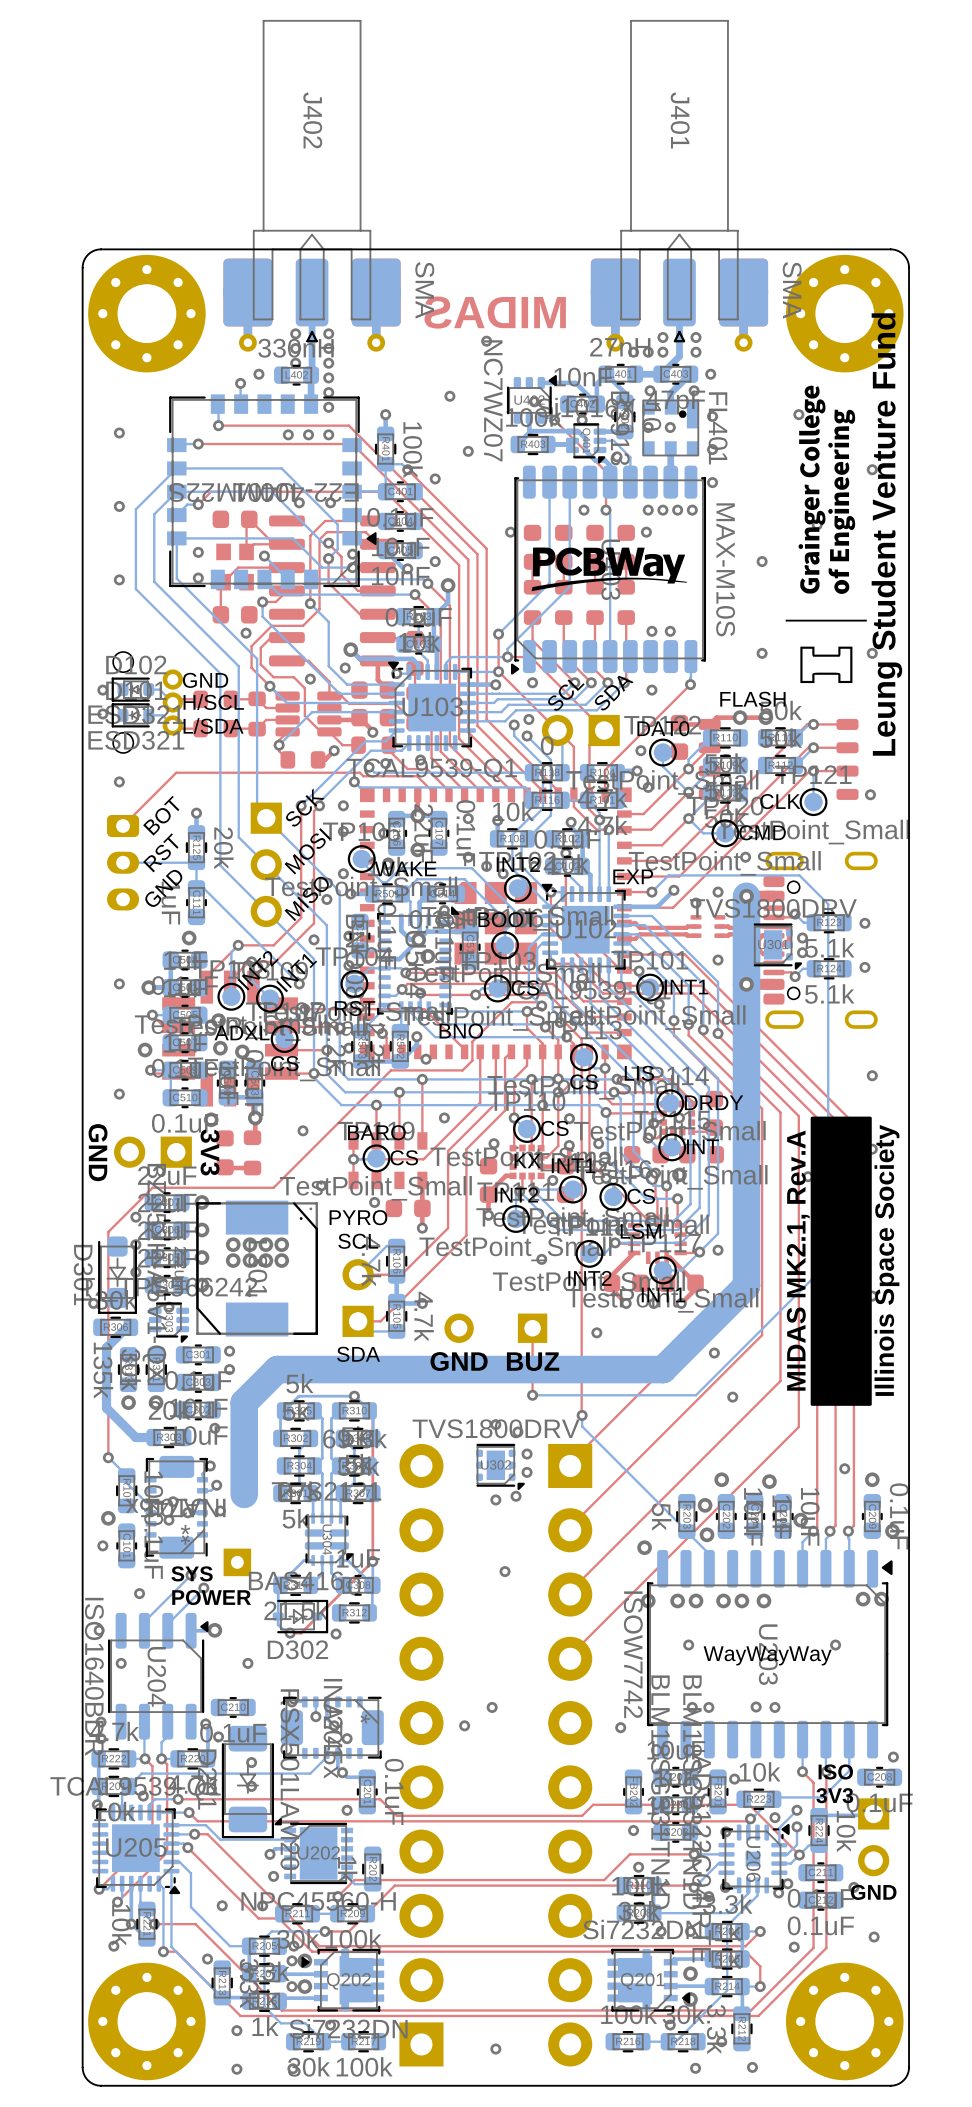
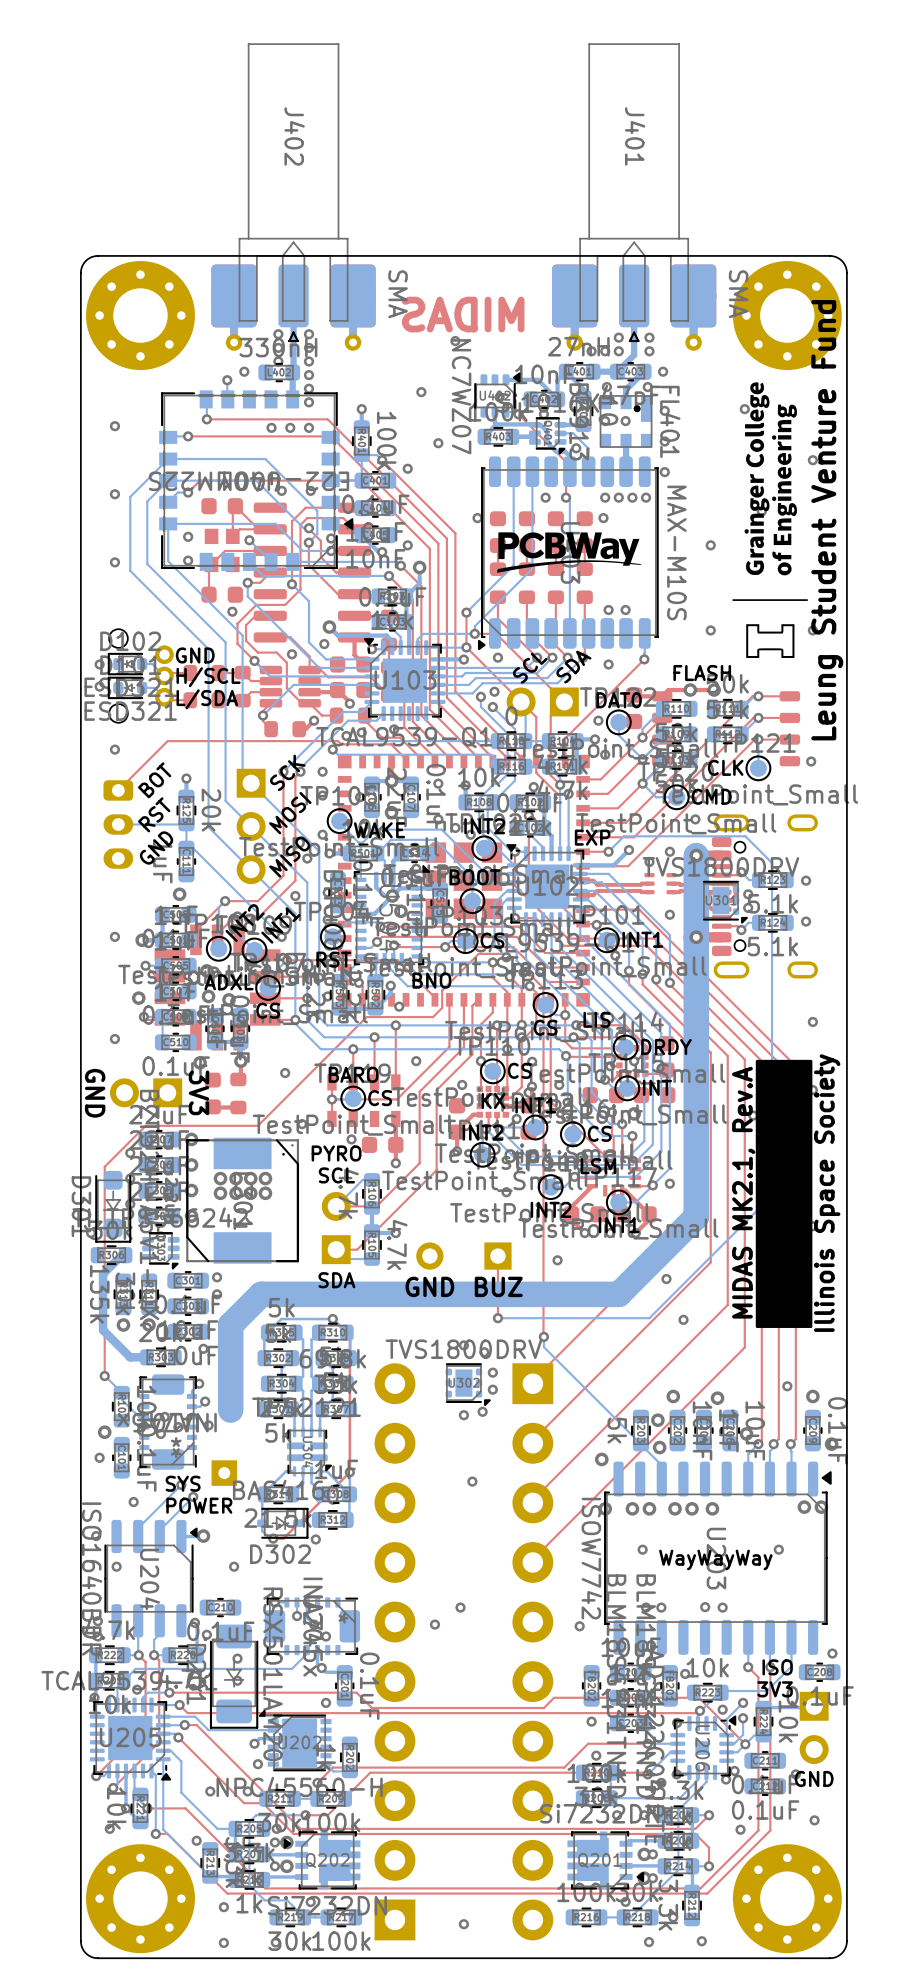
via: none -> (652, 1854)
via: none -> (652, 1878)

